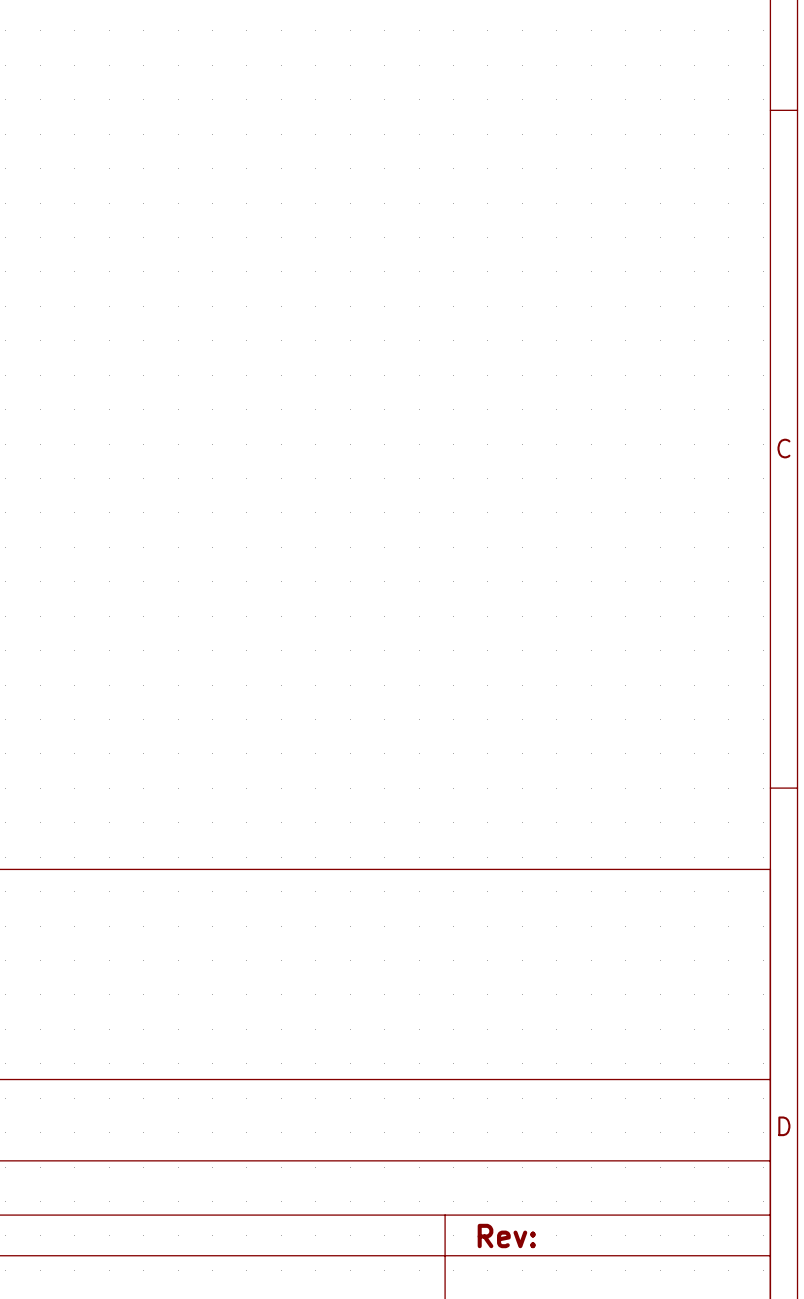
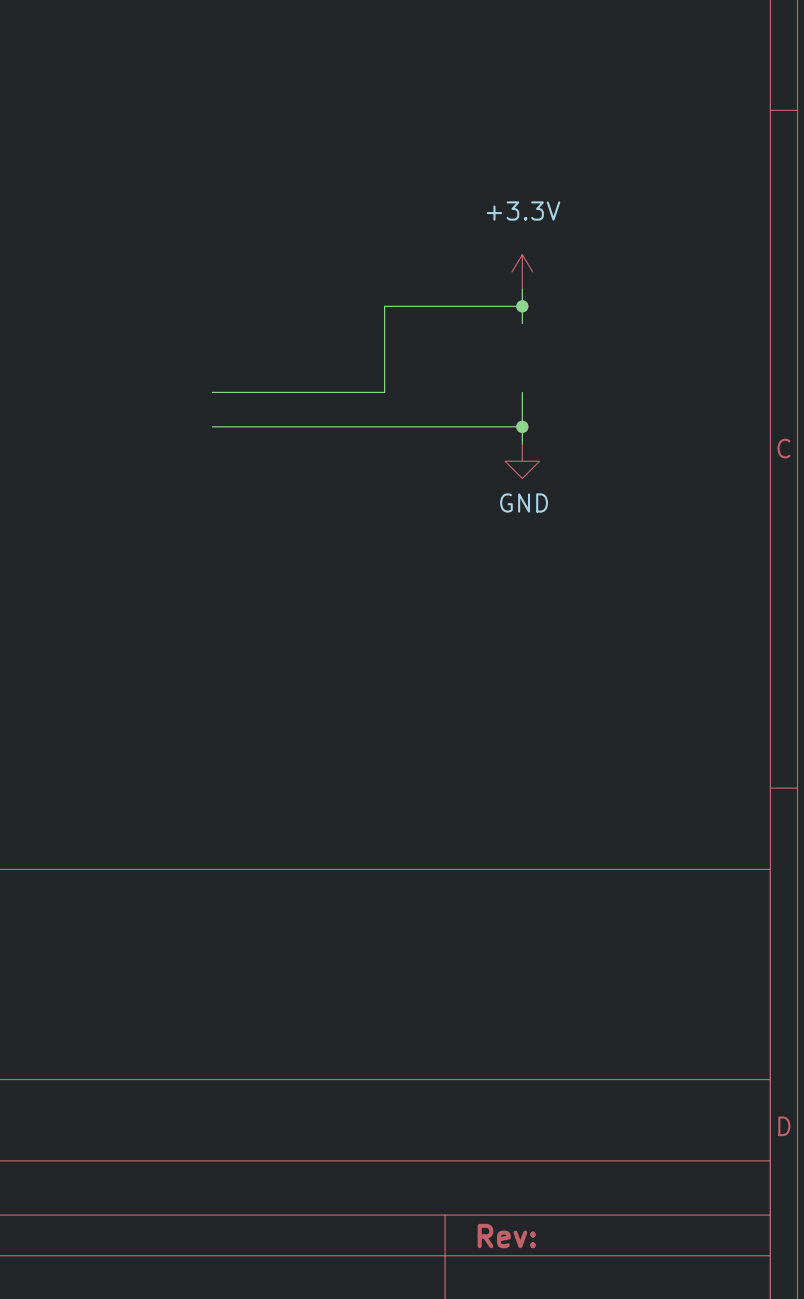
power symbol: none -> +3.3V (522, 271)
wire: none -> (522, 289) (522, 323)
wire: none -> (522, 306) (384, 306) (384, 392) (212, 392)
junction: none -> (522, 306)
wire: none -> (522, 392) (522, 444)
wire: none -> (212, 426) (522, 426)
junction: none -> (522, 426)
power symbol: none -> GND (522, 461)

